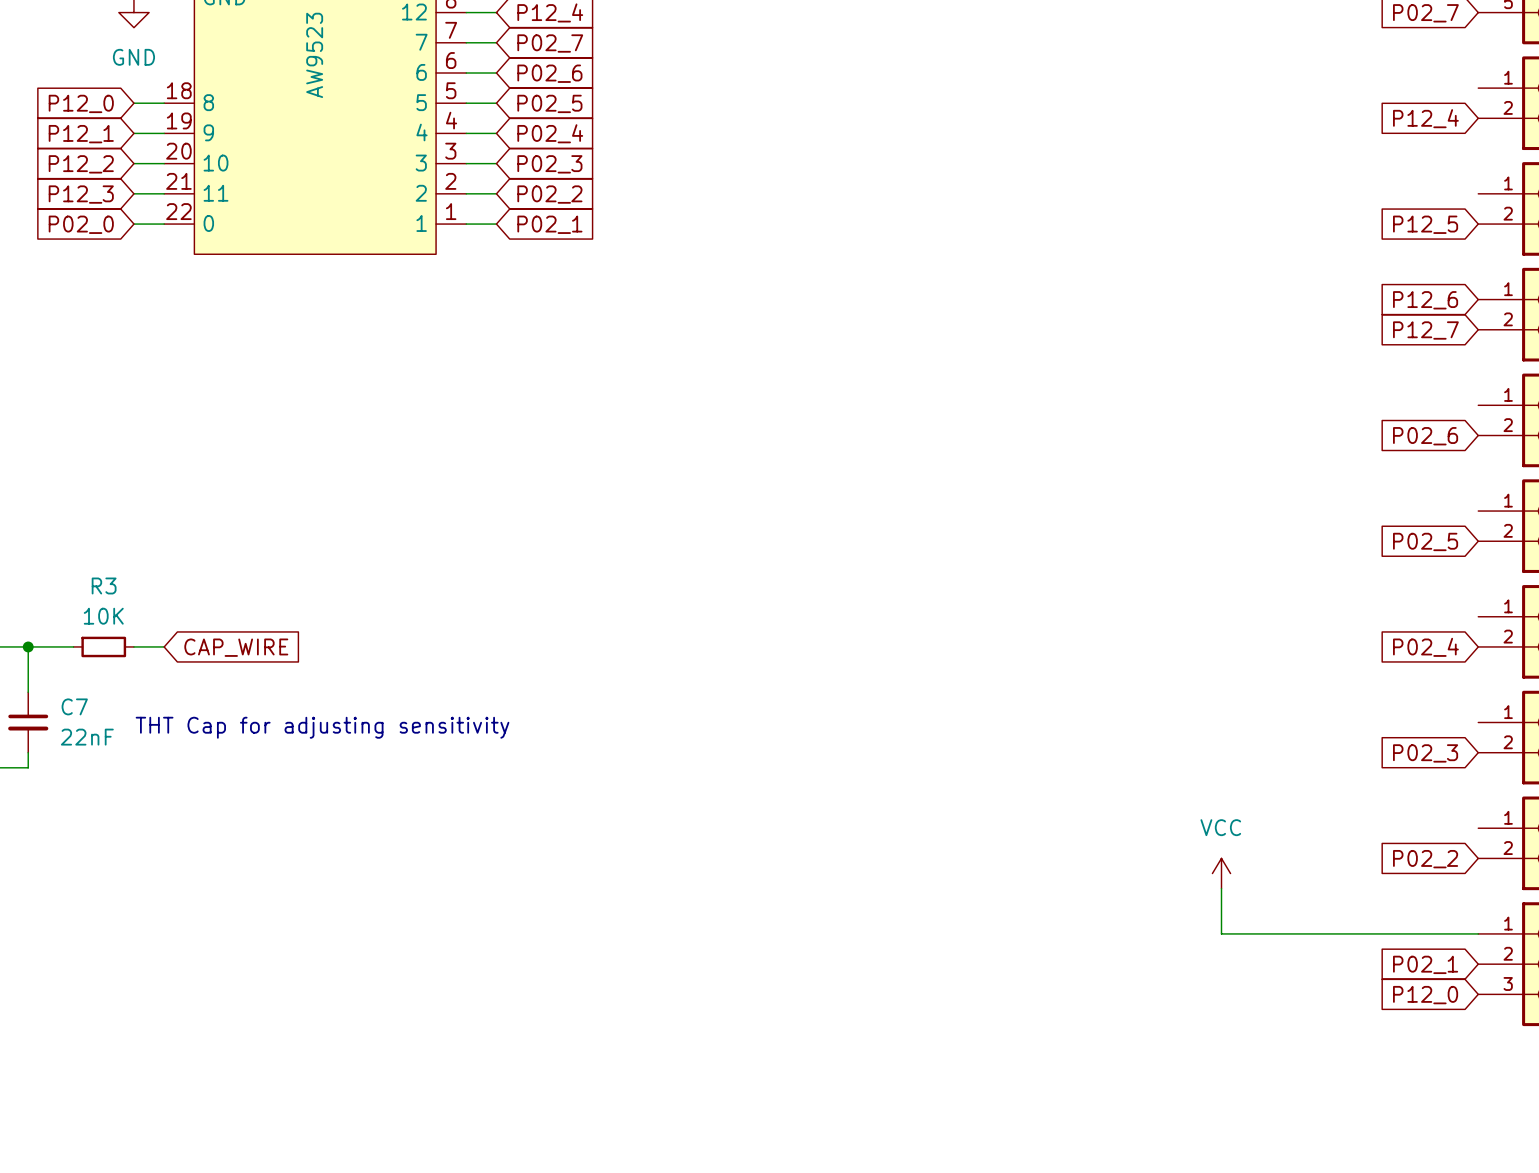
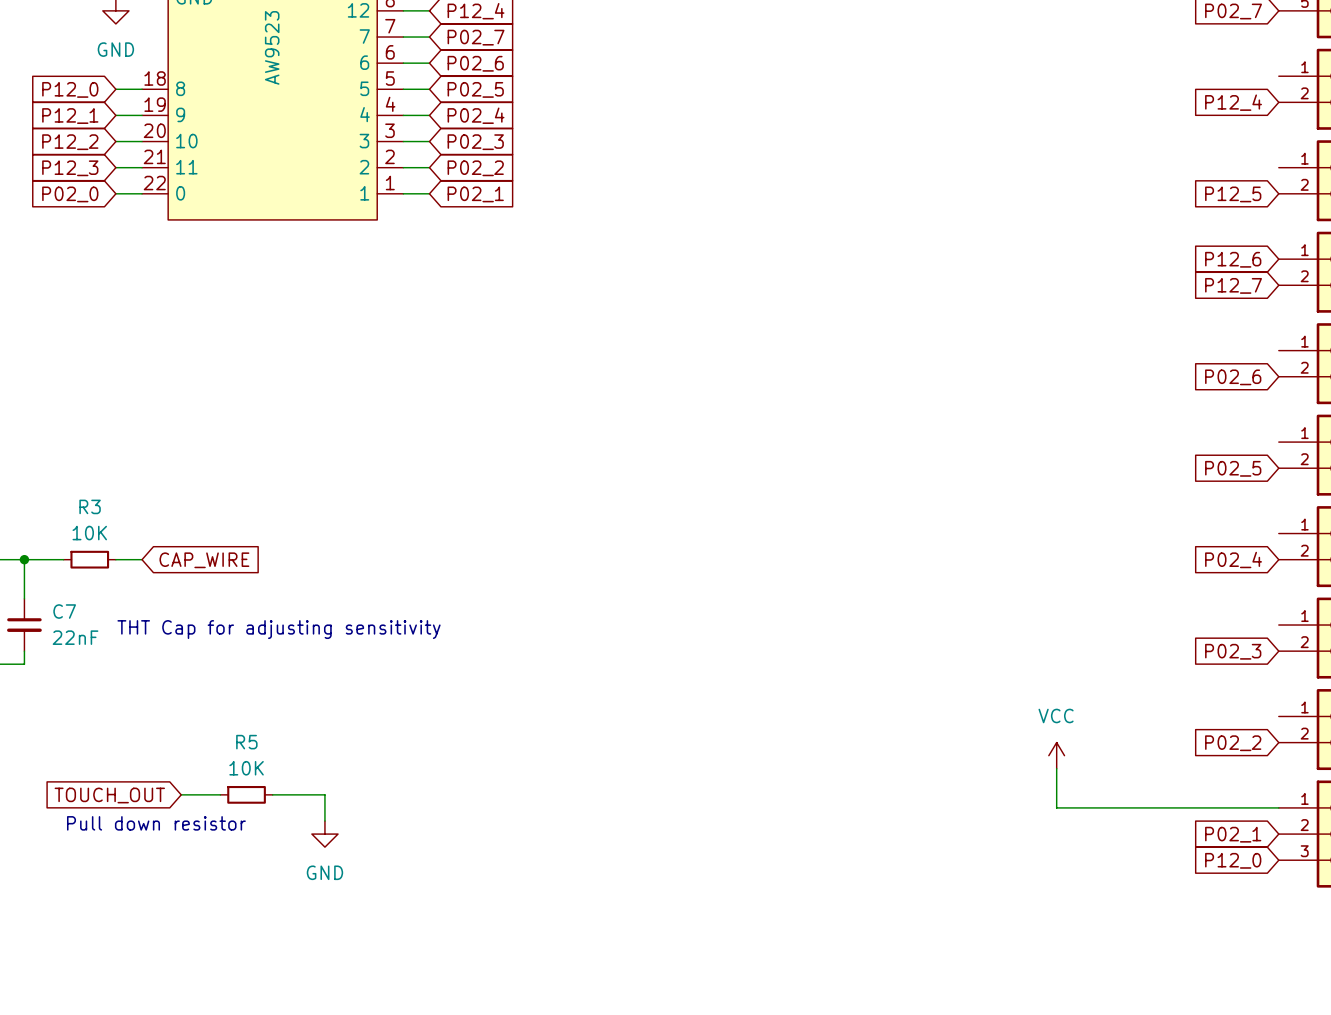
wire: none -> (181, 794) (220, 794)
R5: none -> 10K (246, 794)
wire: none -> (272, 794) (324, 794) (324, 821)
global label: none -> TOUCH_OUT (109, 795)
text: none -> Pull down resistor (156, 823)
power symbol: none -> GND (324, 834)

